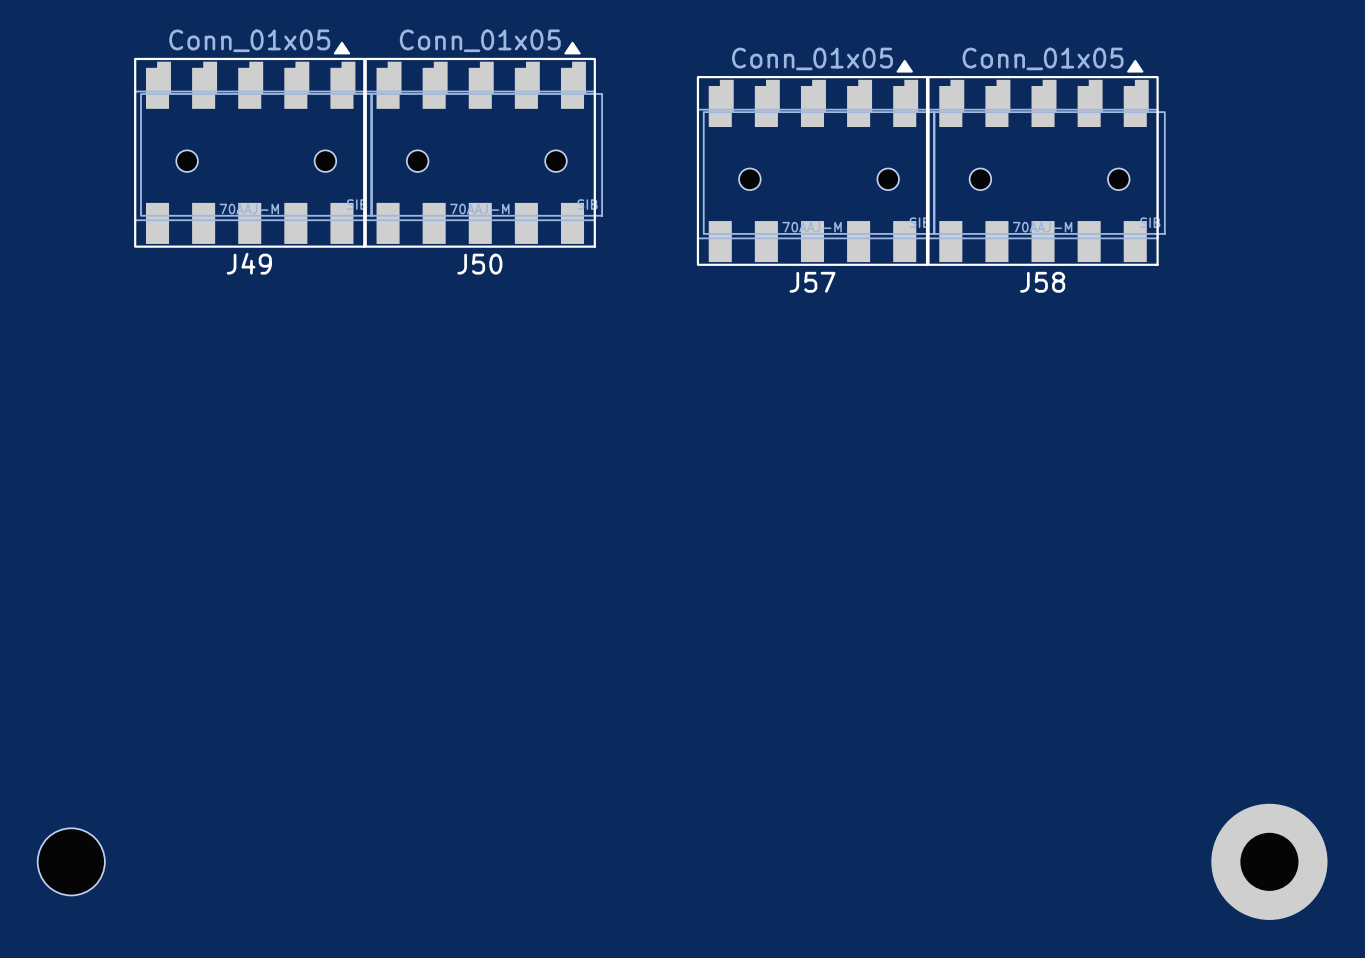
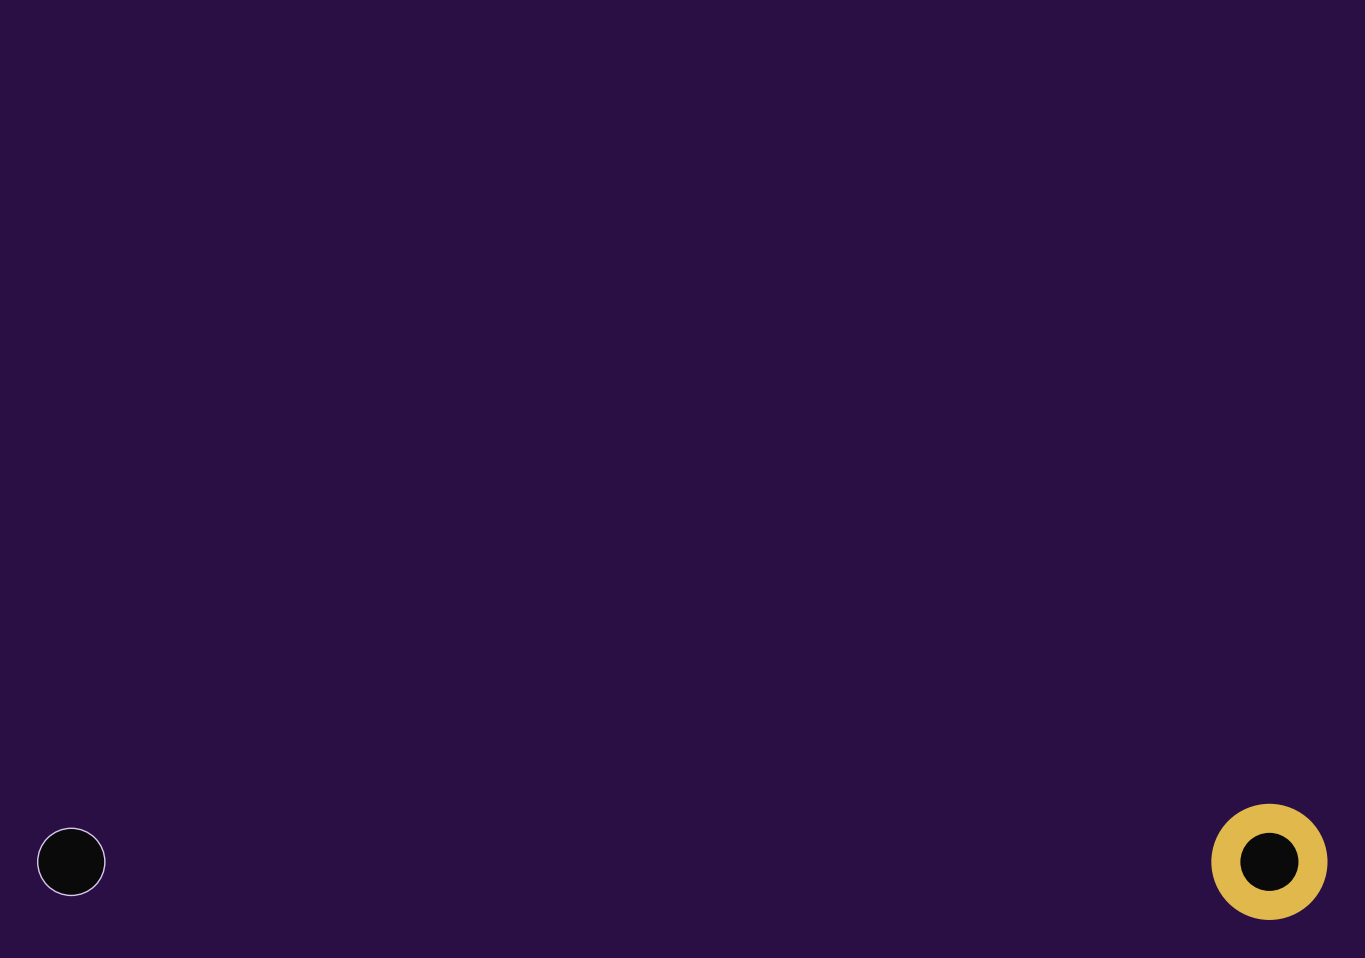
J49: Conn_01x05 (253, 144) -> none
J50: Conn_01x05 (483, 144) -> none
J57: Conn_01x05 (816, 162) -> none
J58: Conn_01x05 (1046, 162) -> none

